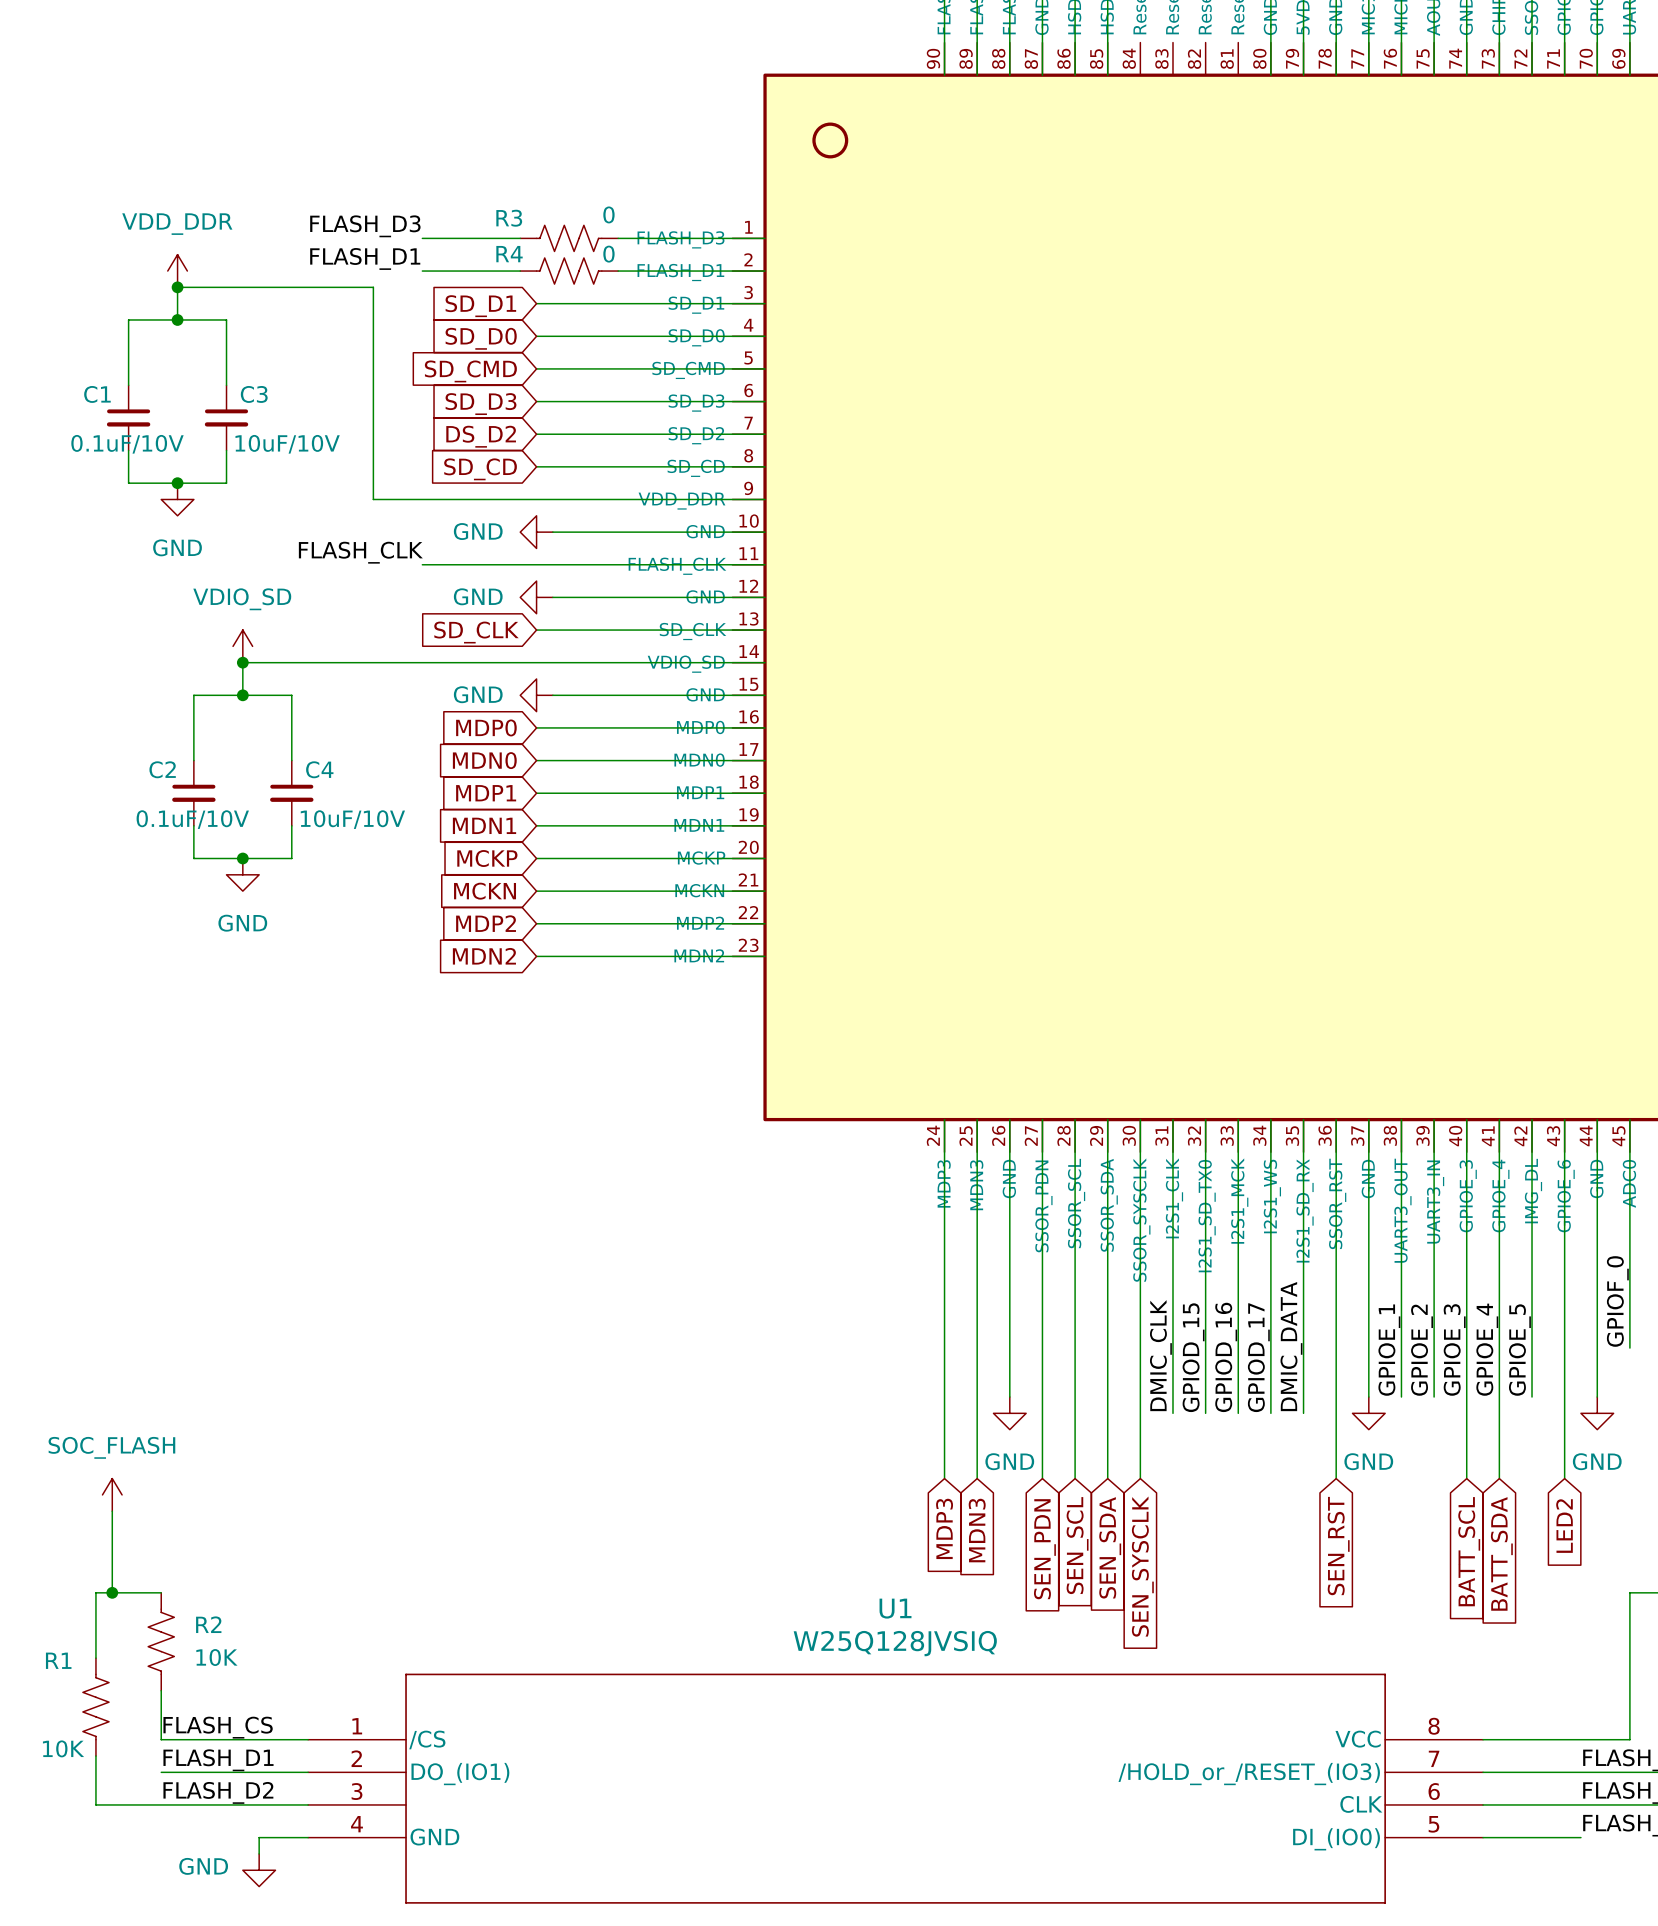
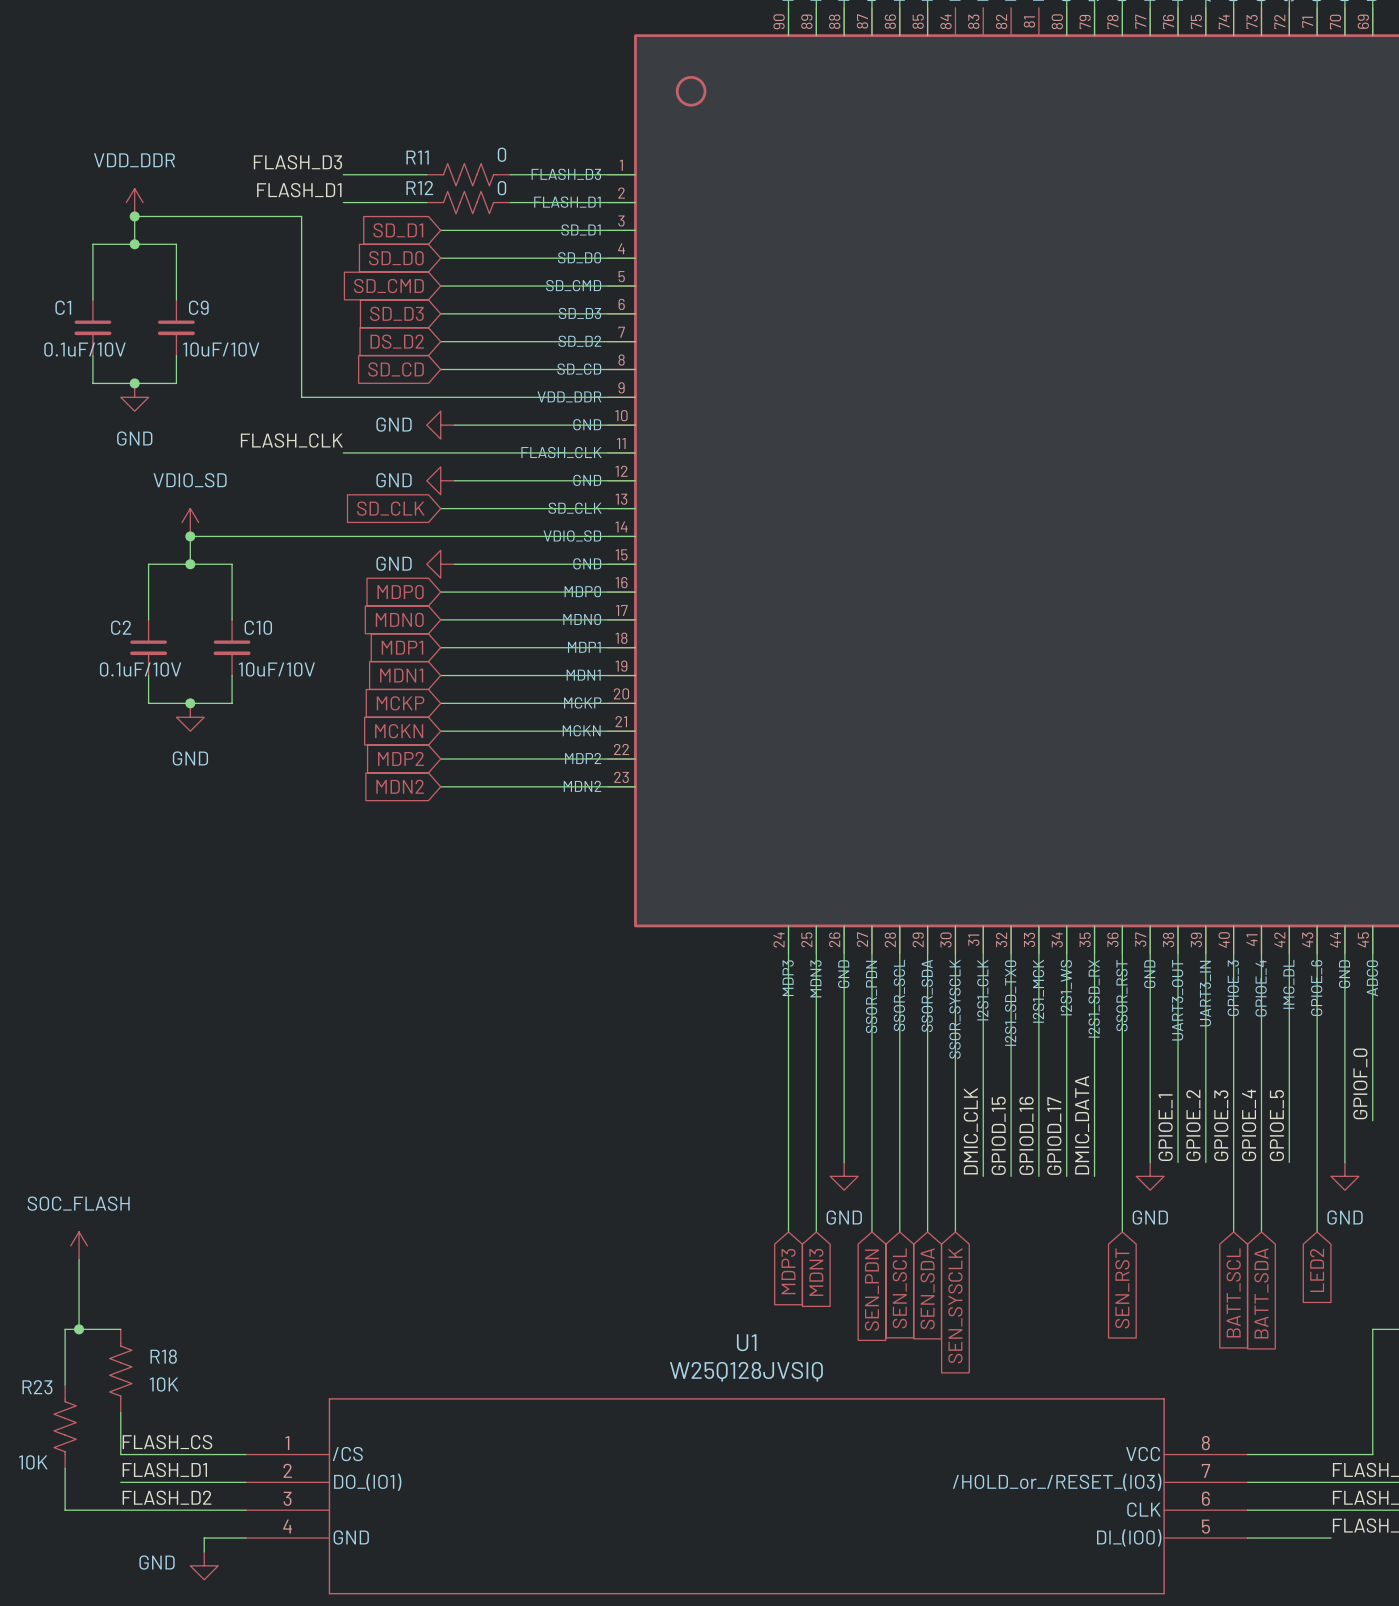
R3 name: R3 (509, 218) -> R11 (417, 157)
R4 name: R4 (509, 254) -> R12 (419, 188)
C3 name: C3 (254, 394) -> C9 (198, 307)
C4 name: C4 (319, 769) -> C10 (258, 627)
R2 name: R2 (208, 1624) -> R18 (163, 1356)
R1 name: R1 (58, 1660) -> R23 (37, 1387)

